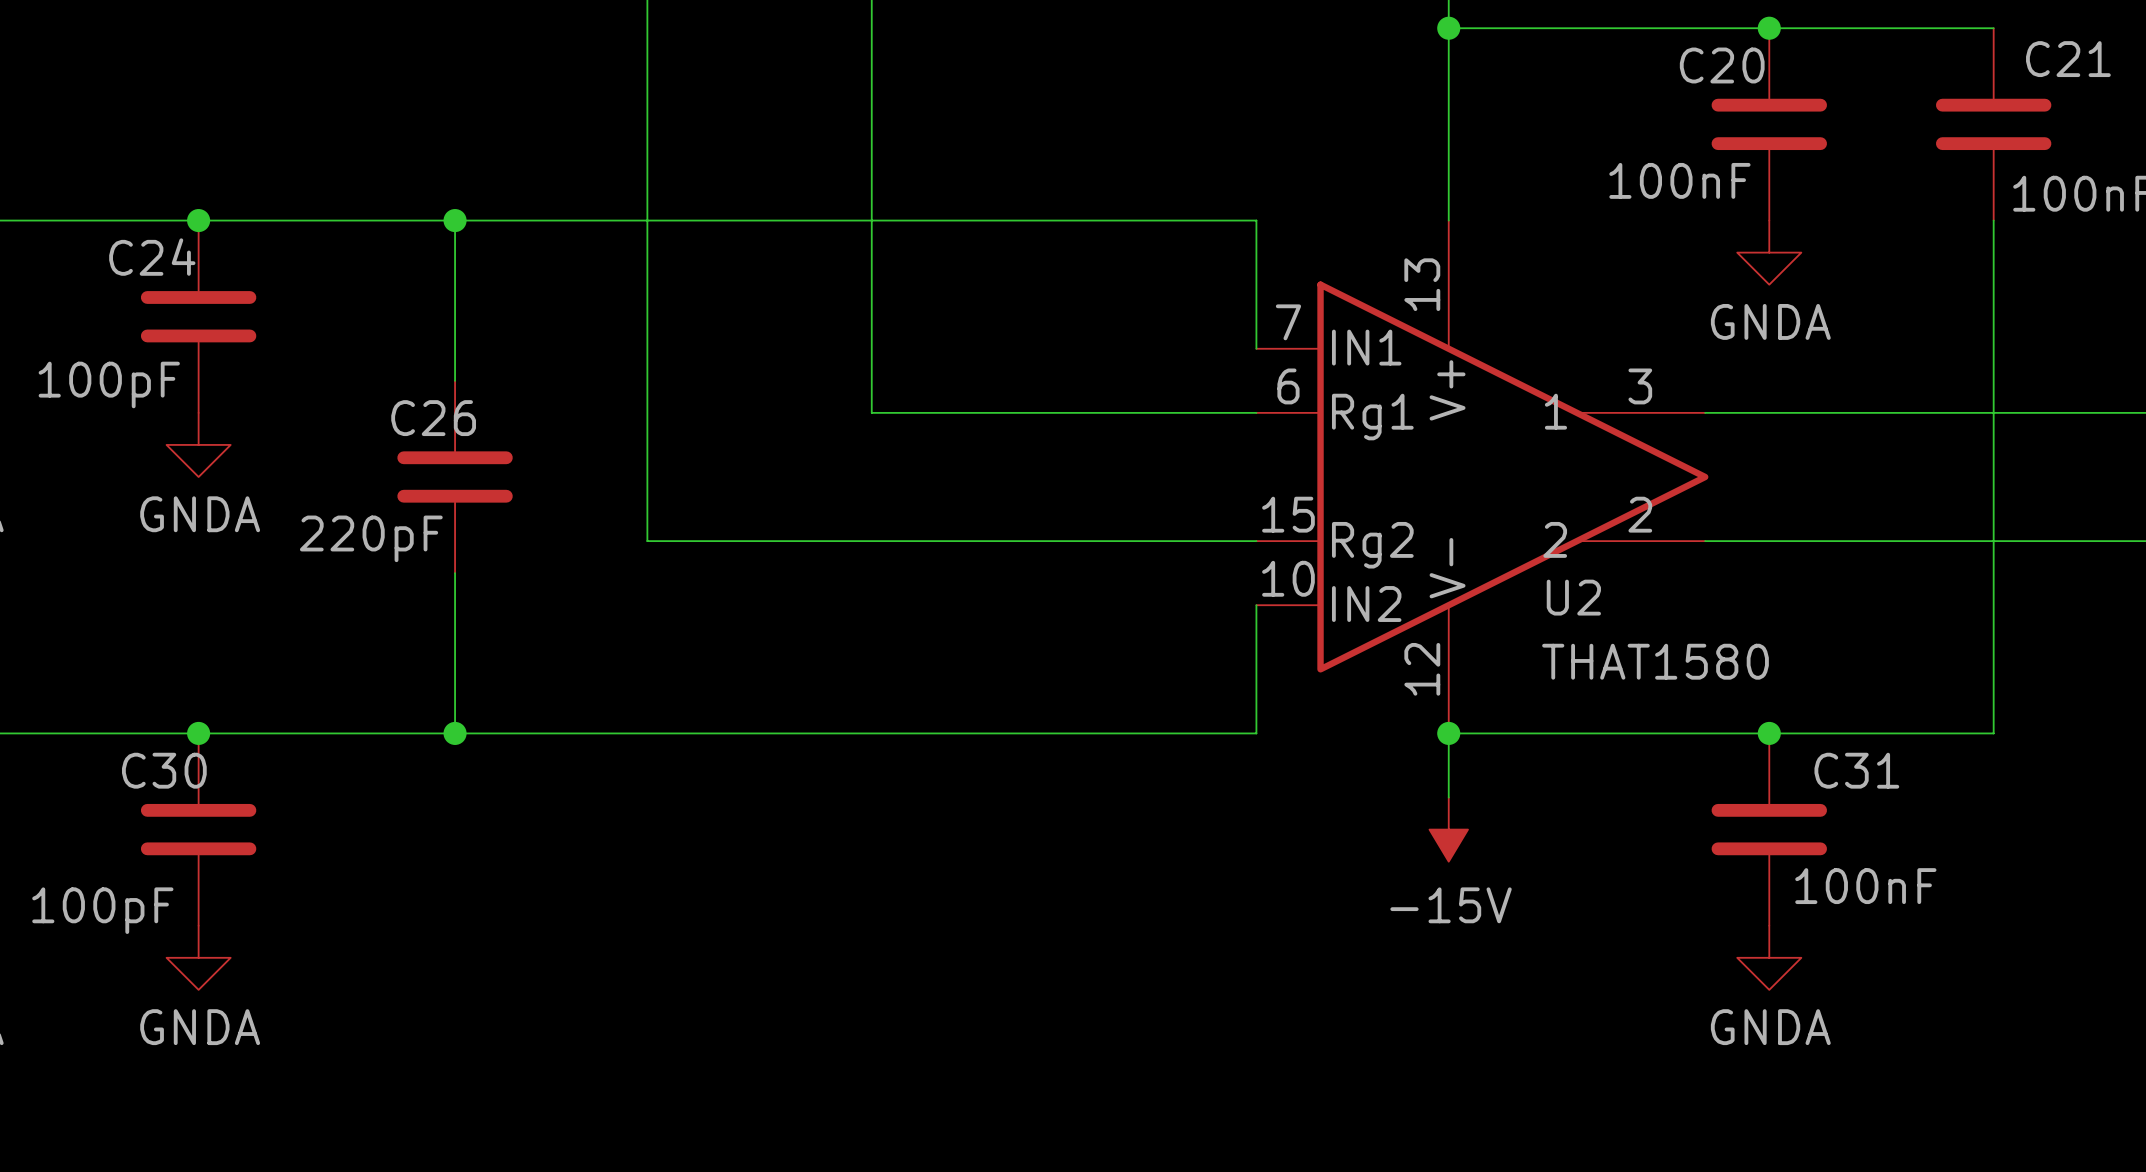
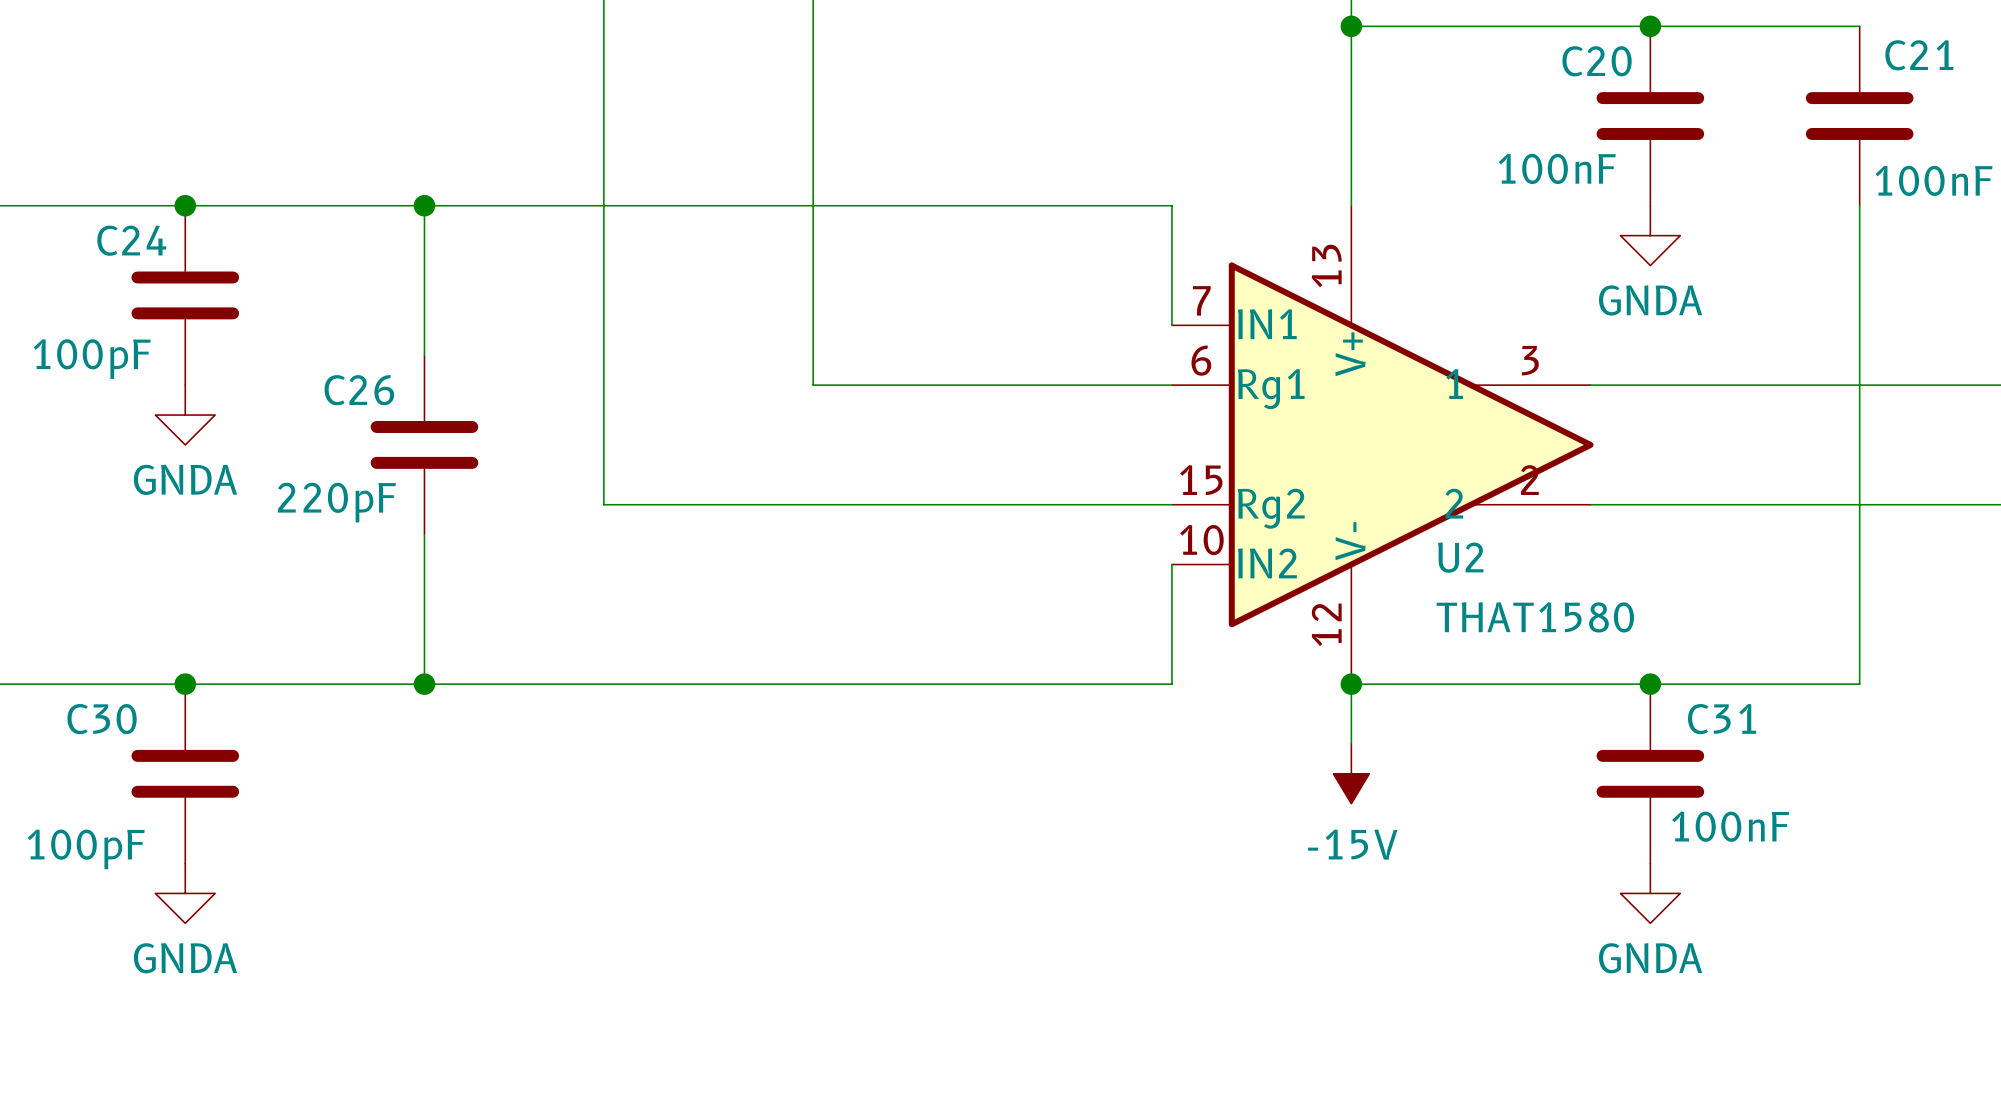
C26 name position: C26 (433, 418) -> C26 (359, 390)
C30 name position: C30 (164, 770) -> C30 (102, 719)

